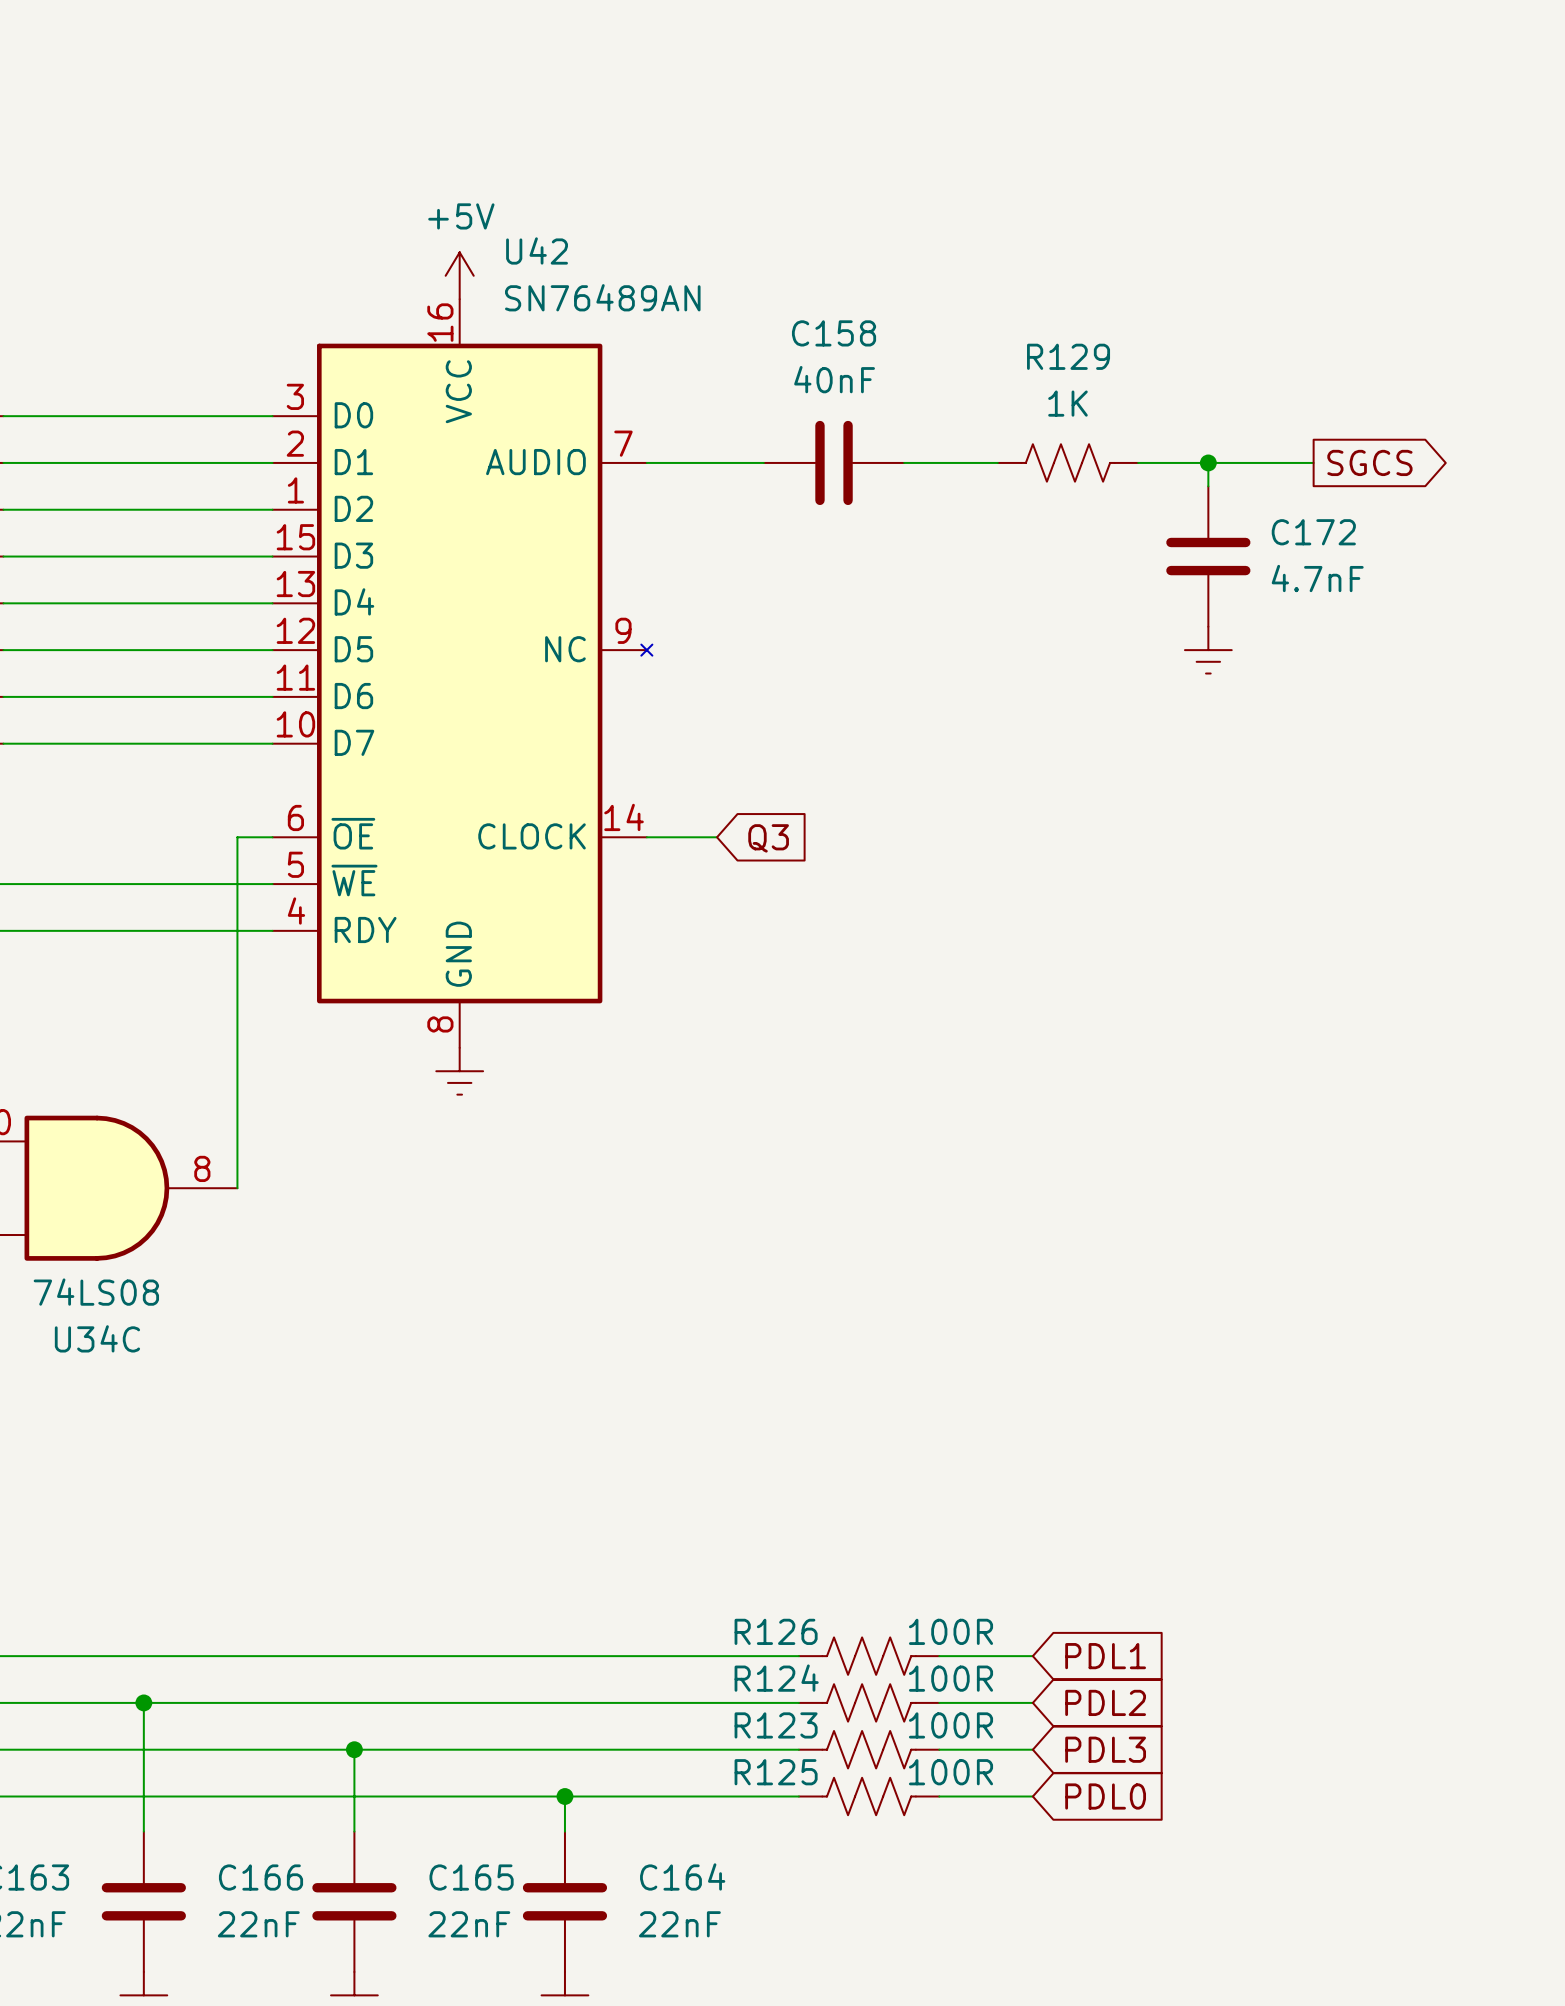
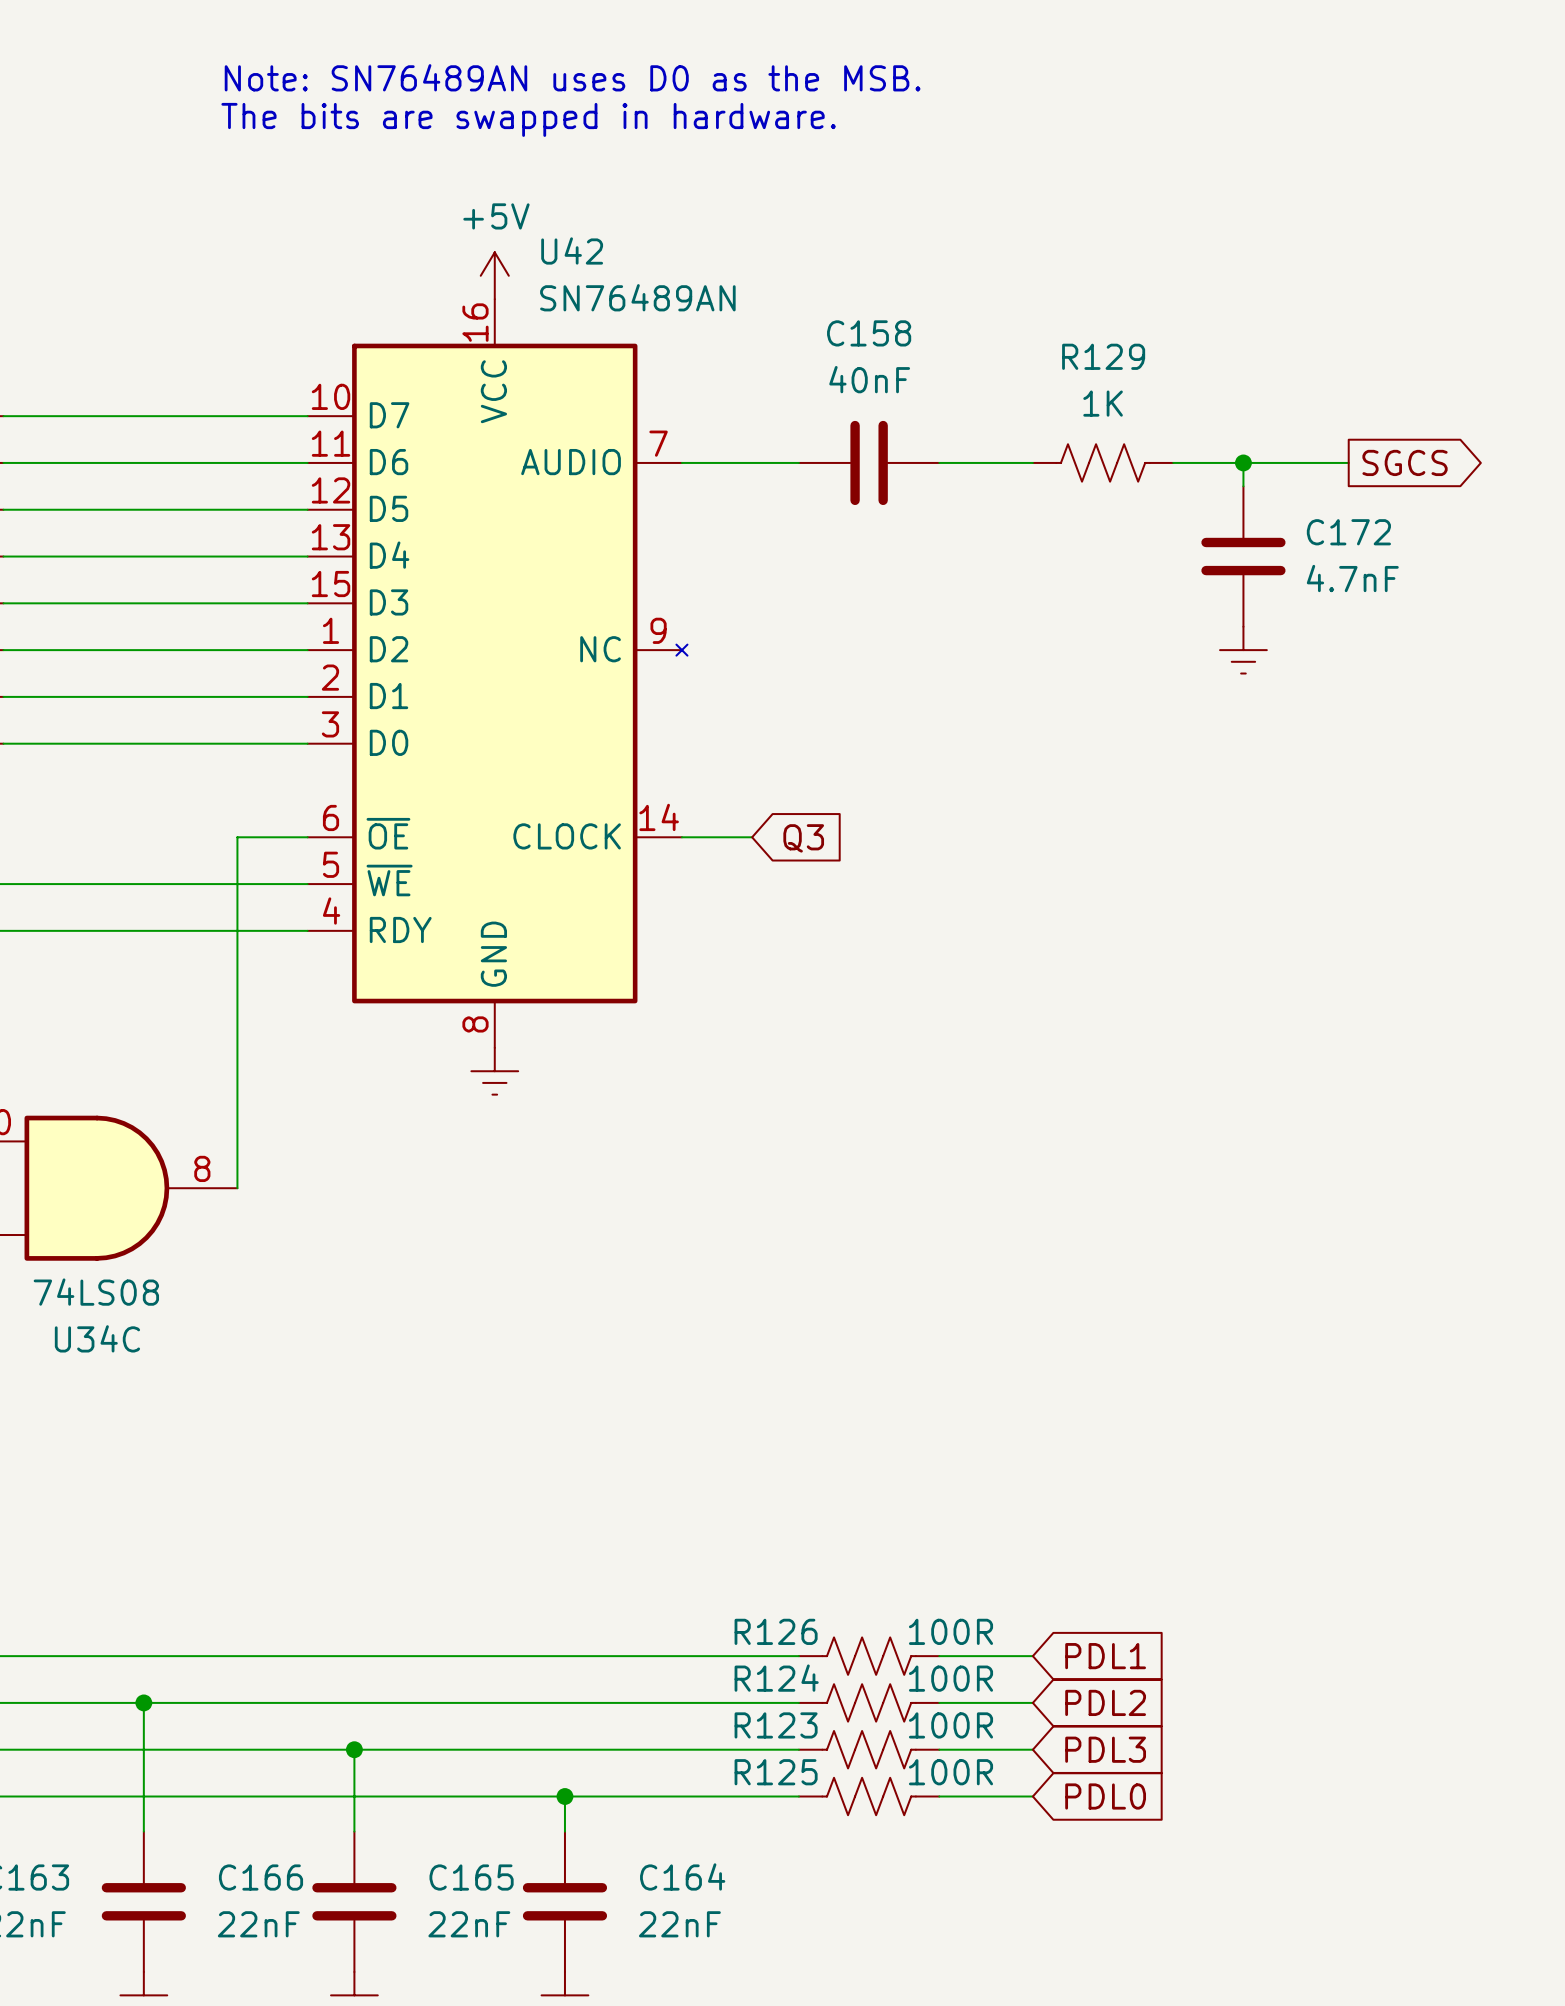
text: none -> Note: SN76489AN uses D0 as the MSB. (572, 77)
text: none -> The bits are swapped in hardware. (528, 119)
power symbol position: +5V (459, 275) -> +5V (494, 275)
U42 symbol: [272, 299, 653, 1048] -> [307, 299, 688, 1048]
C158 position: (834, 462) -> (869, 462)
R129 position: (1067, 462) -> (1103, 462)
wire: (1208, 462) (1208, 486) -> (1243, 462) (1243, 486)
junction position: (1208, 462) -> (1243, 462)
wire: none -> (1313, 462) (1348, 462)
global label position: SGCS (1369, 462) -> SGCS (1405, 462)
C172 position: (1208, 556) -> (1243, 556)
power symbol position: (1208, 650) -> (1243, 650)
wire: none -> (717, 837) (752, 837)
global label position: Q3 (768, 838) -> Q3 (803, 838)
power symbol position: (459, 1071) -> (494, 1071)

